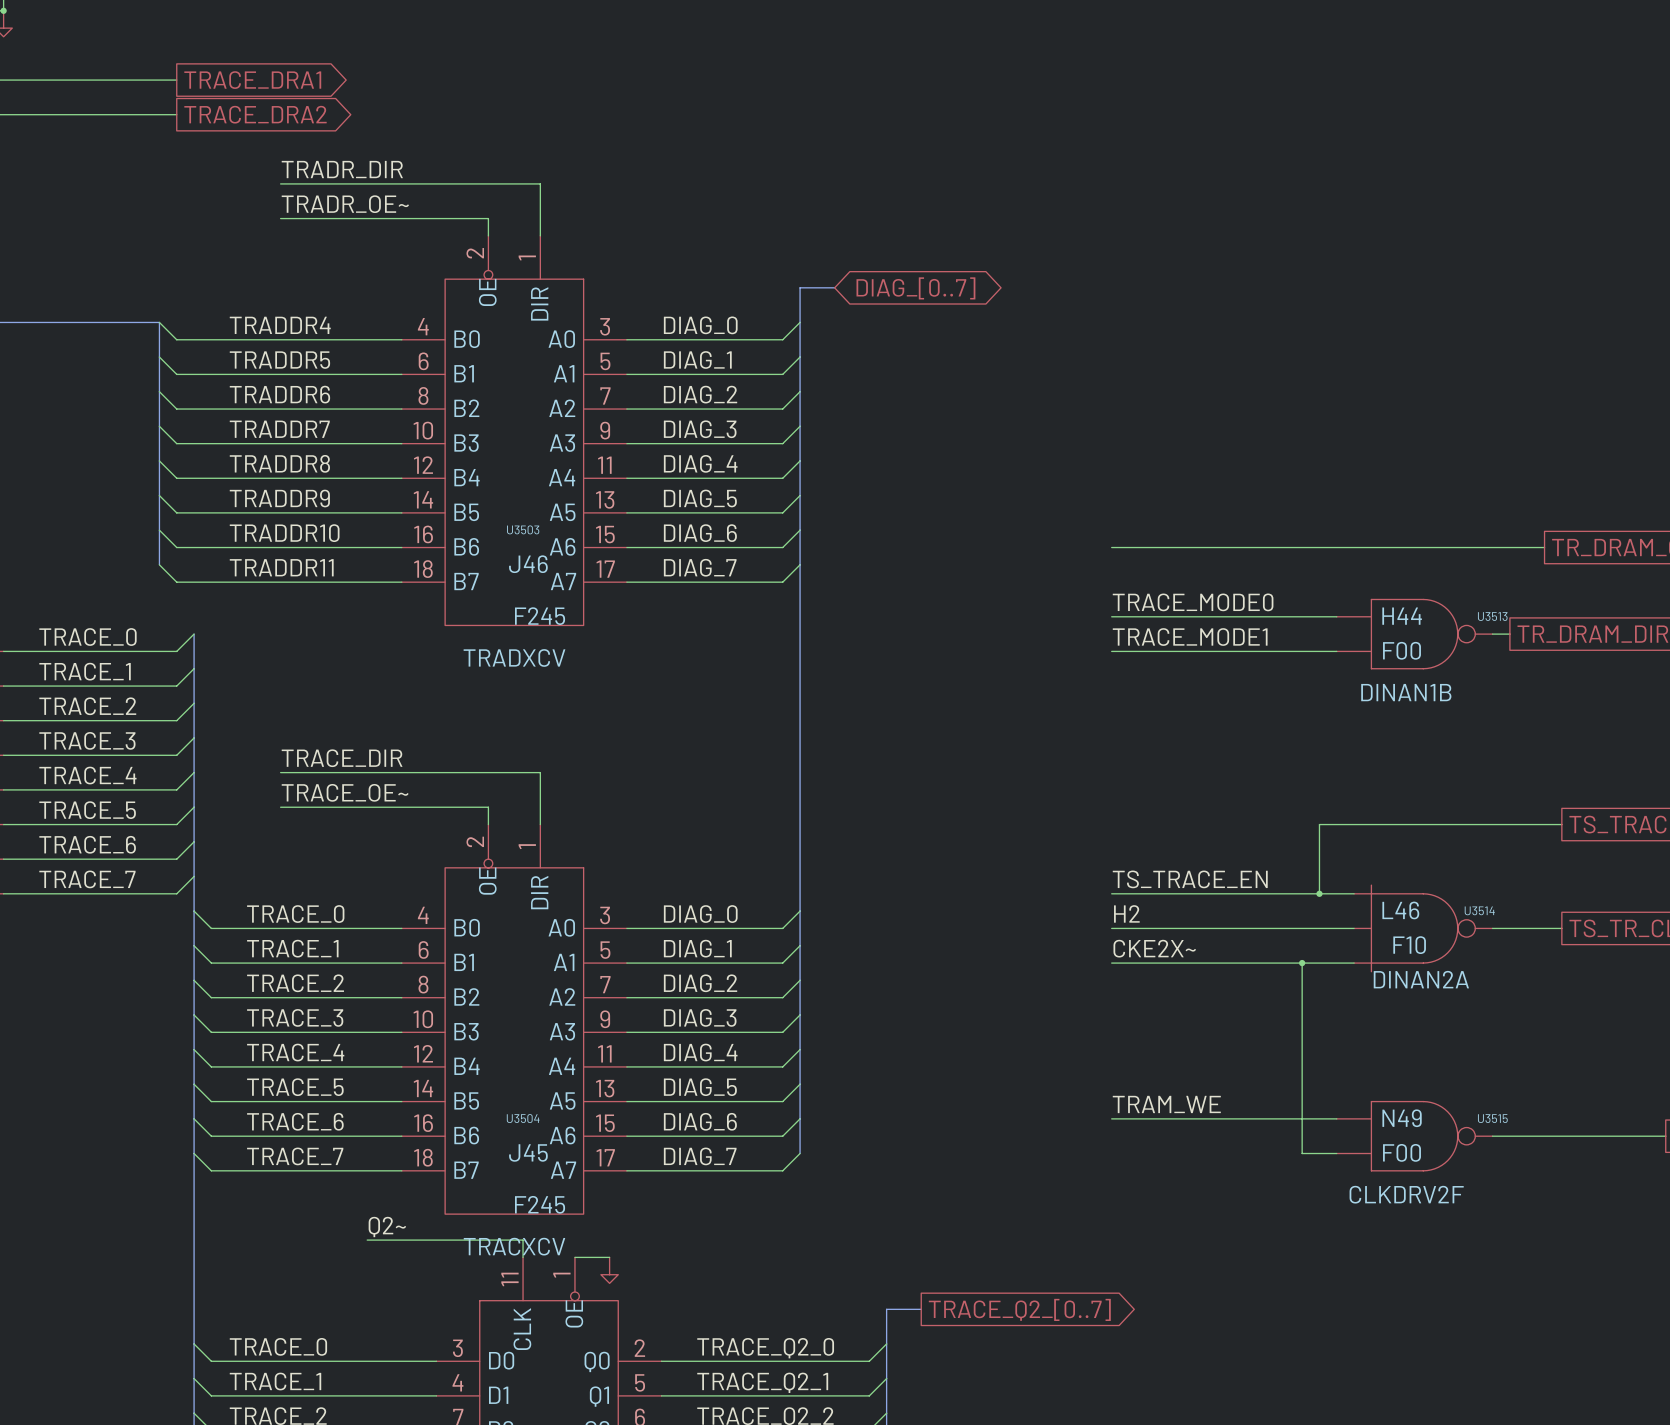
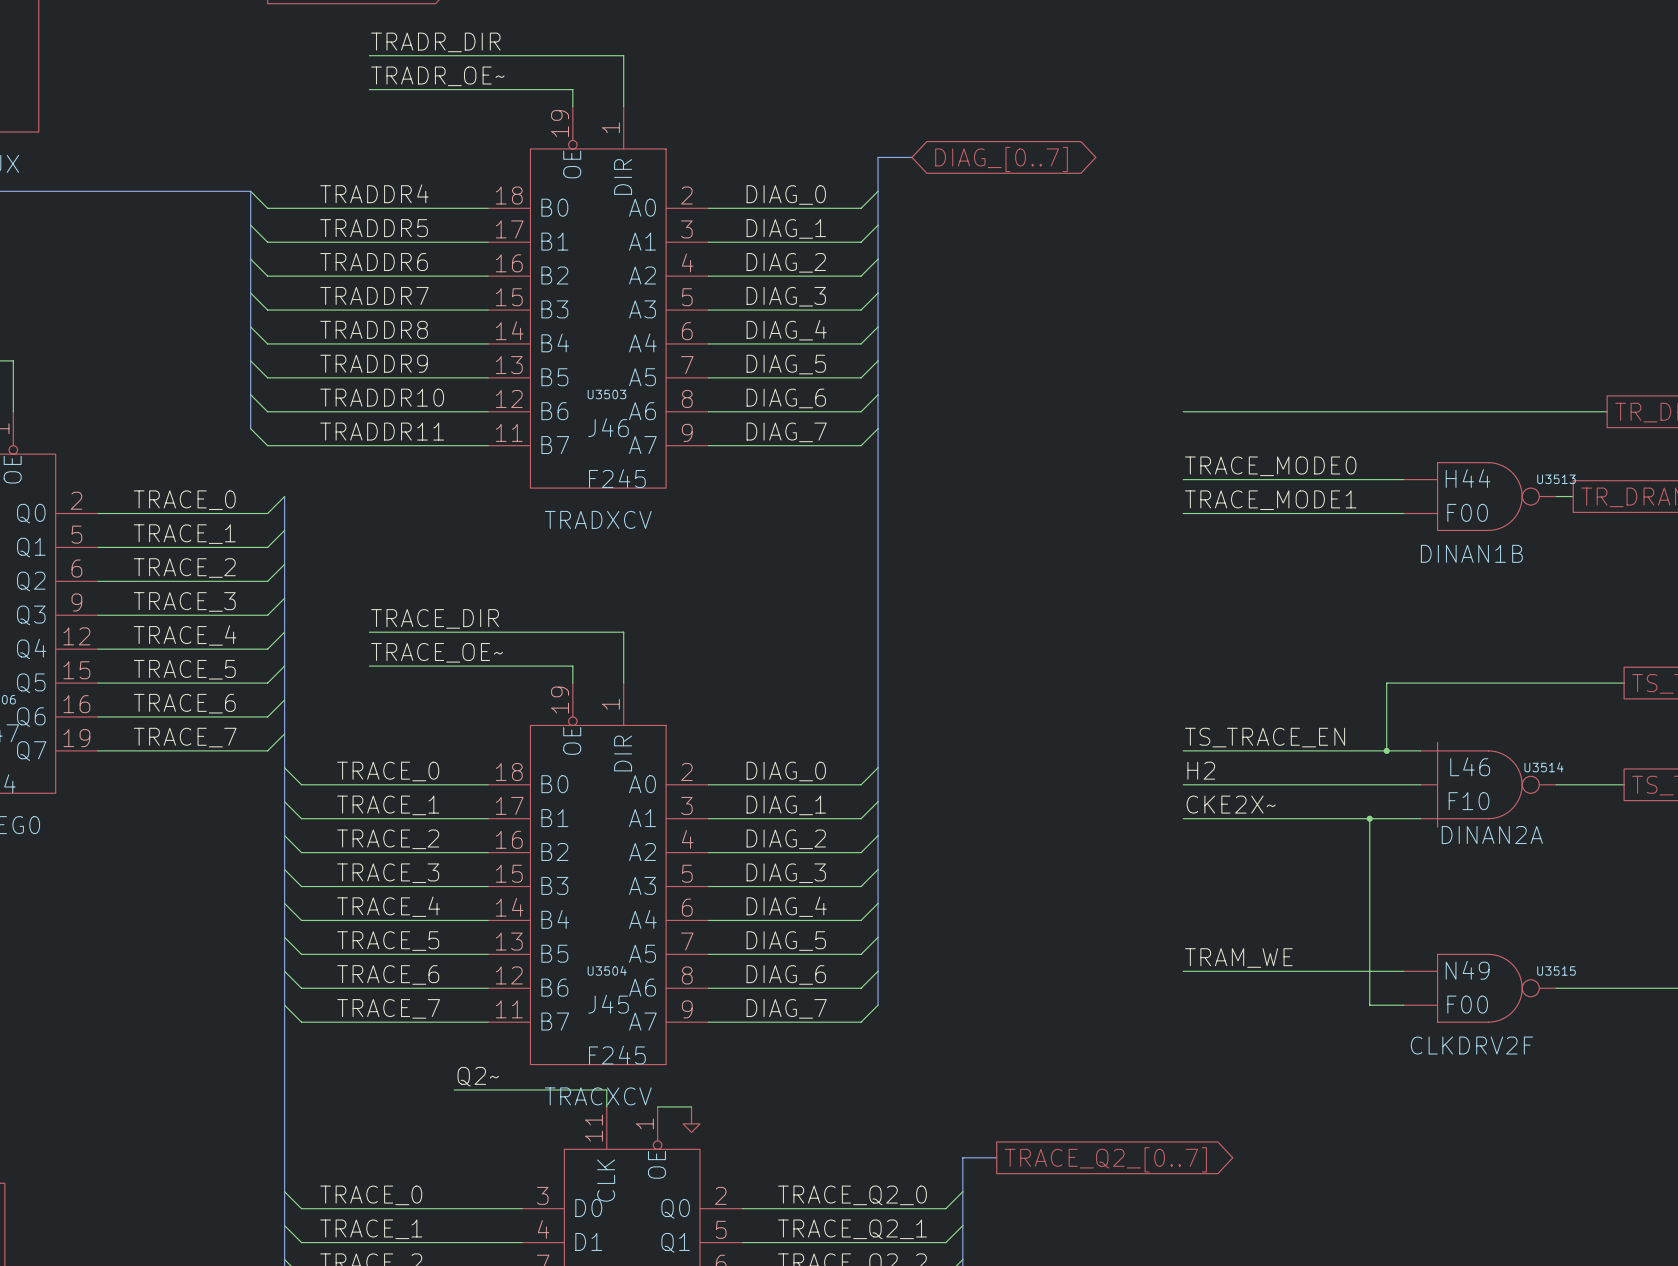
U3503 symbol: [401, 235, 627, 626] -> [488, 106, 709, 489]
U3504 symbol: [401, 824, 627, 1215] -> [488, 683, 709, 1065]

